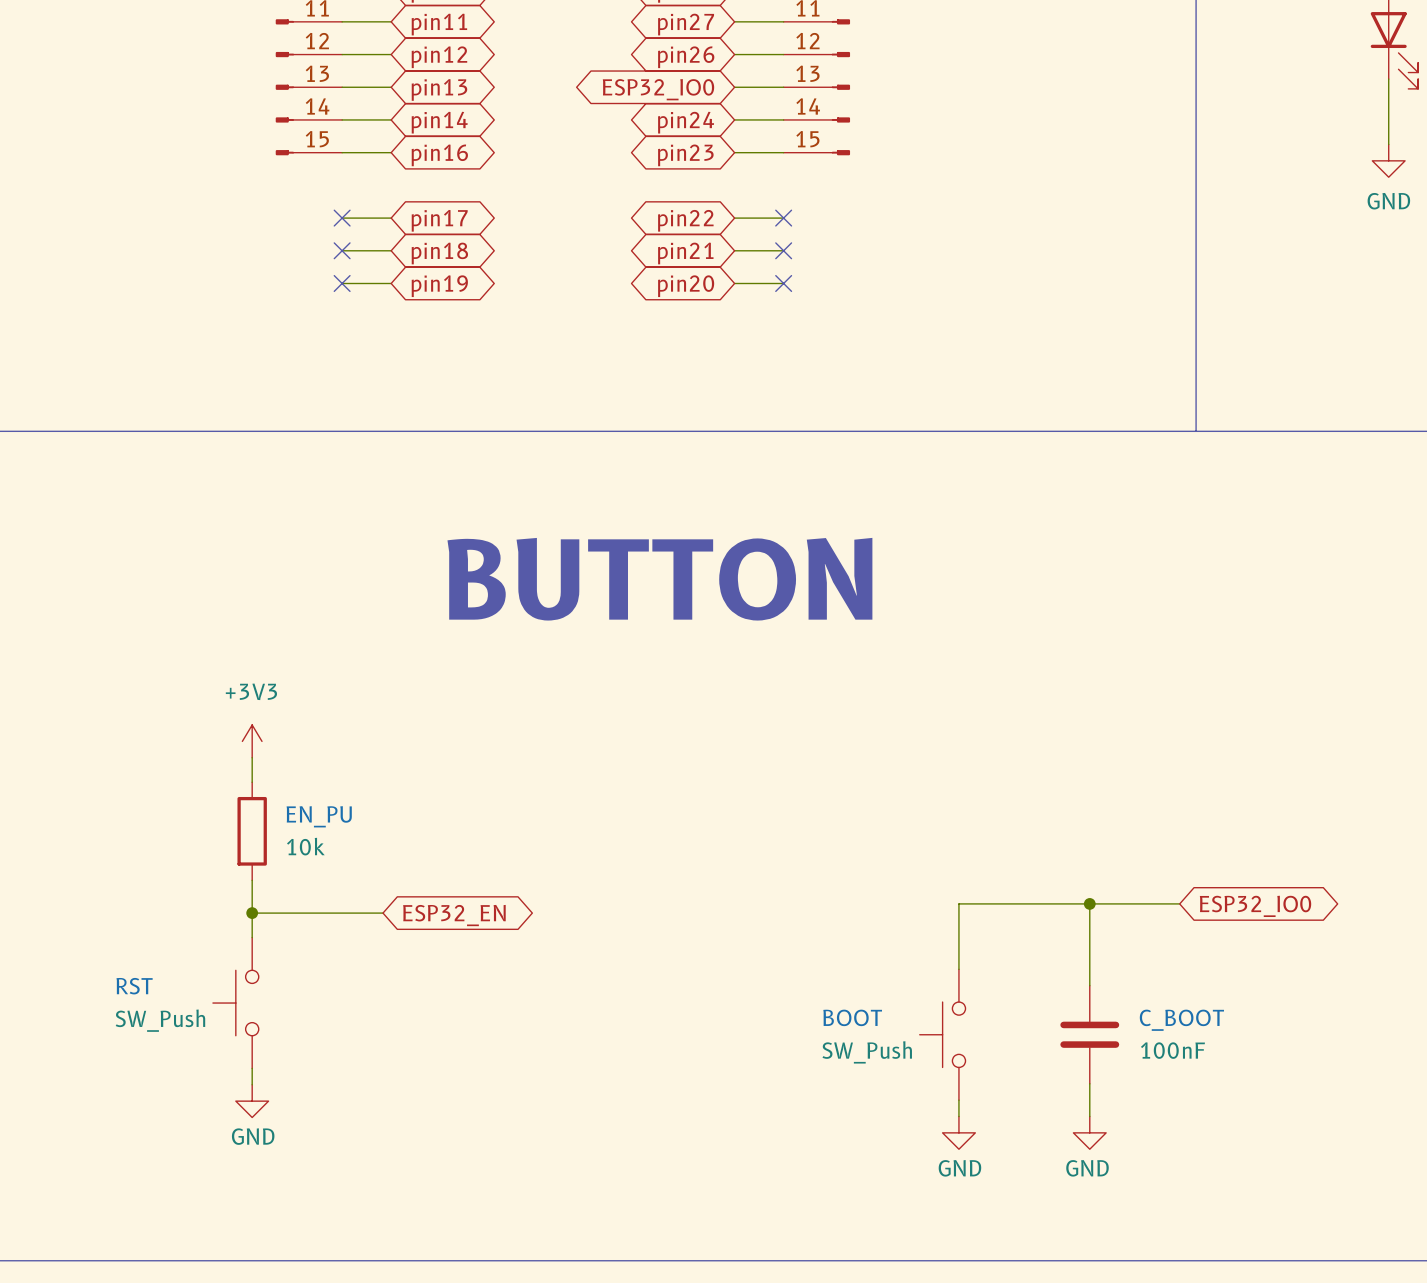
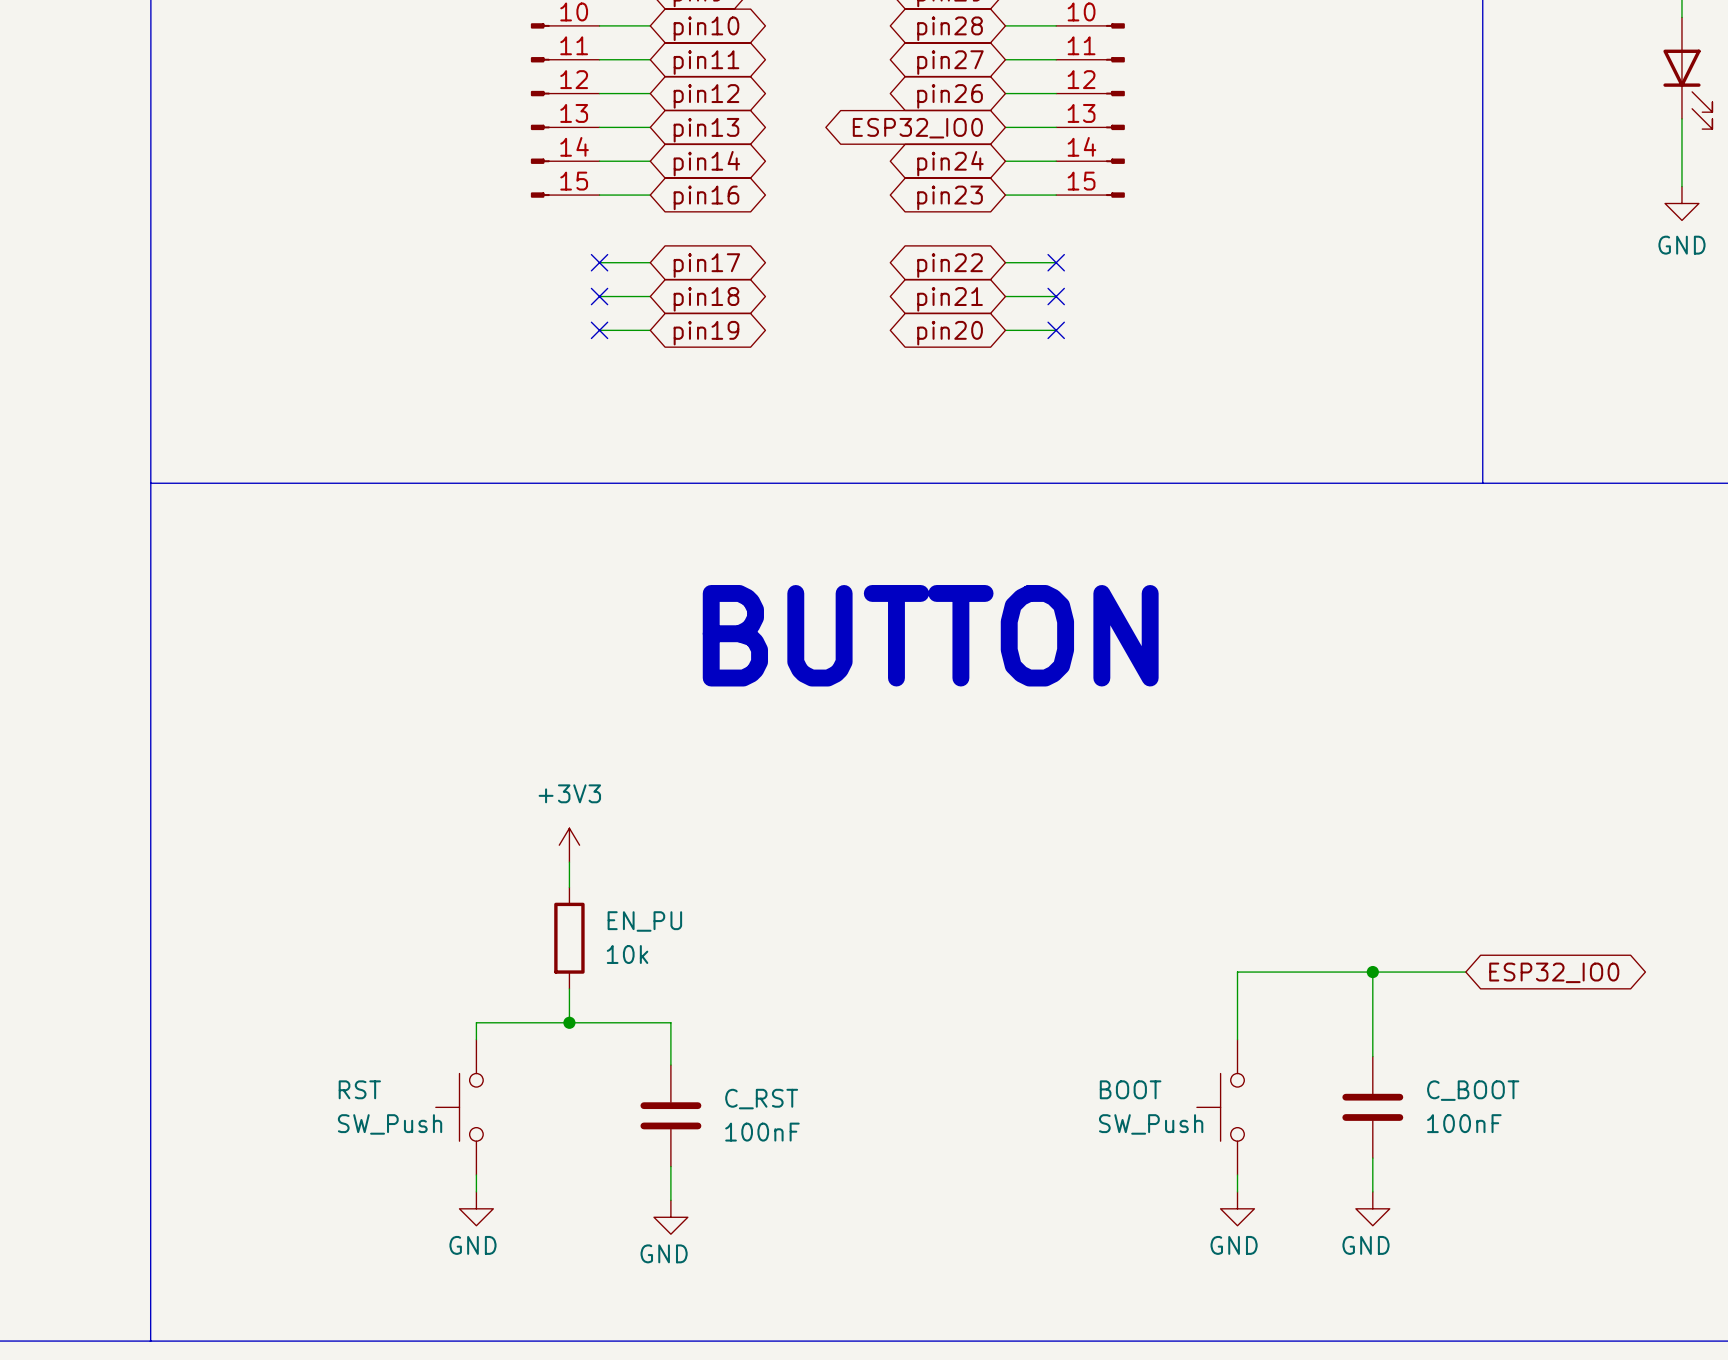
power symbol position: +3V3 (252, 741) -> +3V3 (569, 845)
wire: (252, 757) (252, 782) -> (569, 862) (569, 887)
EN_PU position: (252, 831) -> (569, 938)
wire: (252, 880) (252, 937) -> none
wire: (252, 913) (383, 913) -> none
junction position: (252, 913) -> (569, 1022)
global label: ESP32_EN (454, 915) -> none
wire: none -> (569, 988) (569, 1022)
wire: none -> (476, 1039) (476, 1022) (670, 1022) (670, 1065)
RST position: (235, 1003) -> (459, 1107)
C_RST: none -> 100nF (670, 1115)
wire: (252, 1068) (252, 1084) -> (476, 1175) (476, 1191)
wire: none -> (670, 1166) (670, 1200)
power symbol position: GND (252, 1101) -> GND (476, 1208)
power symbol: none -> GND (670, 1217)

